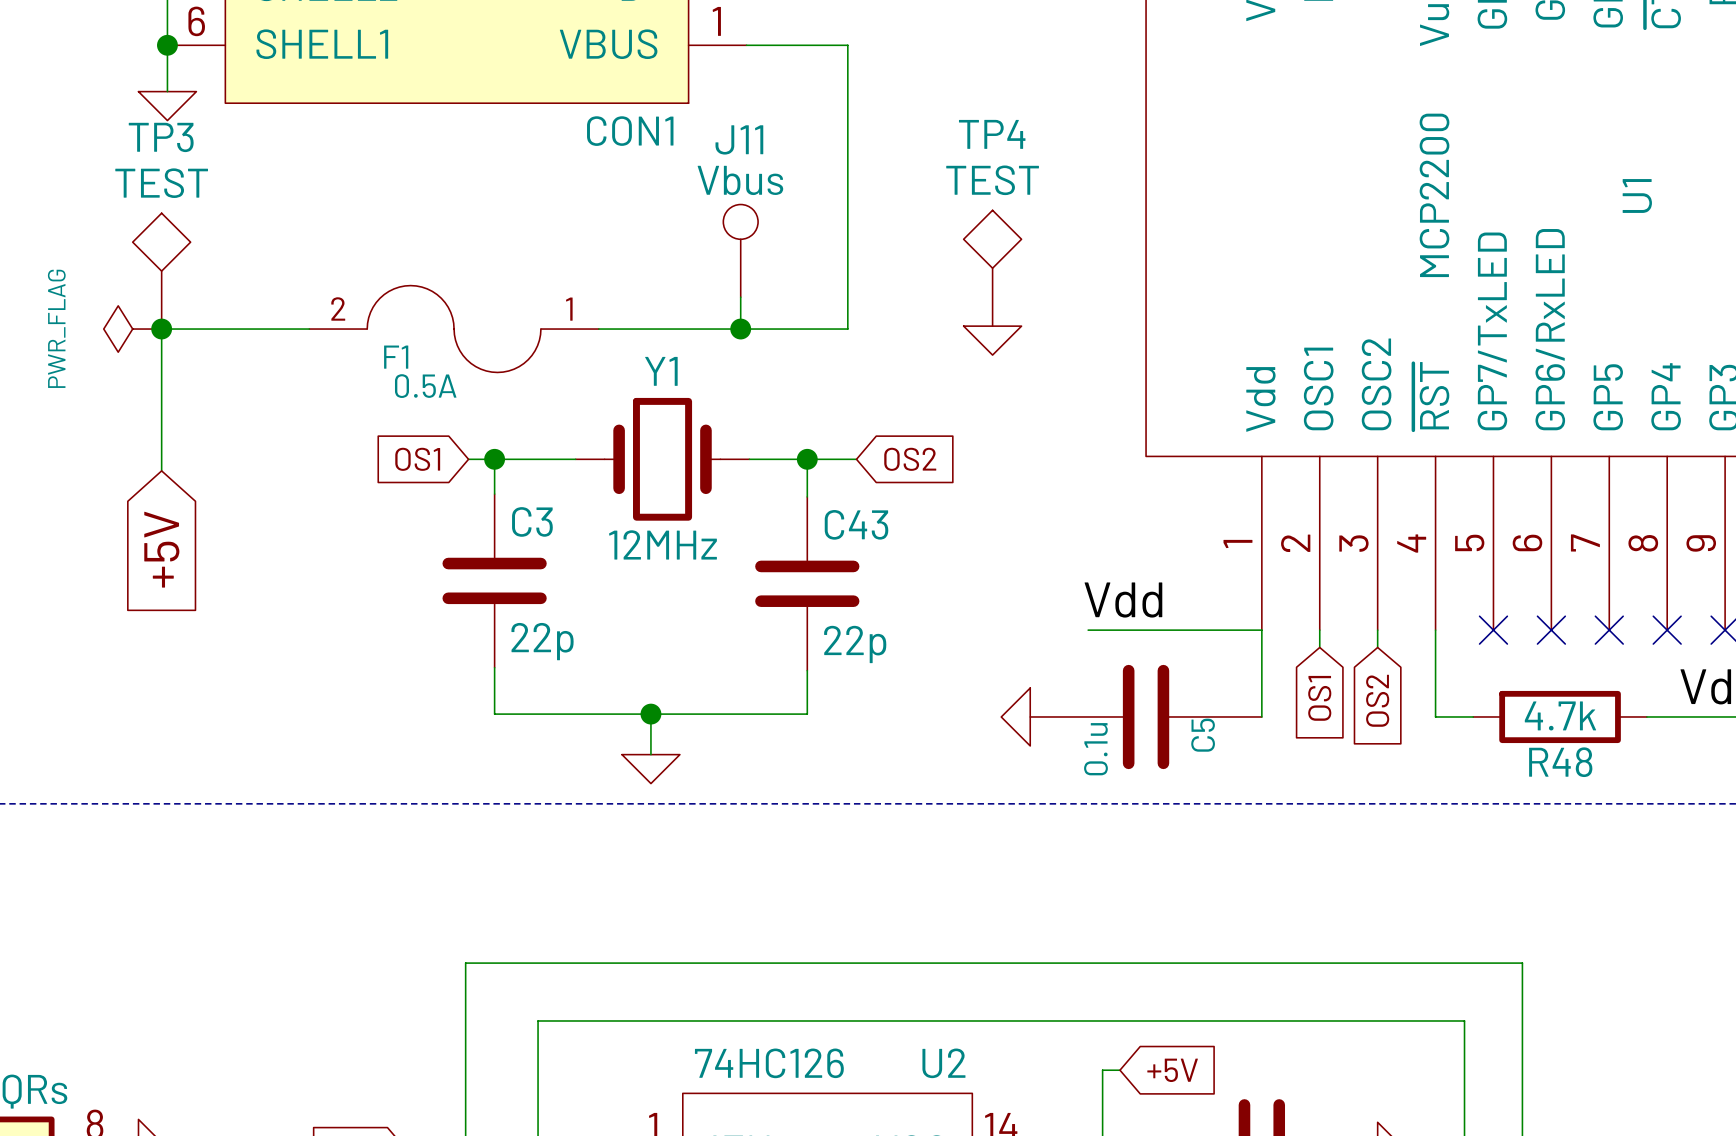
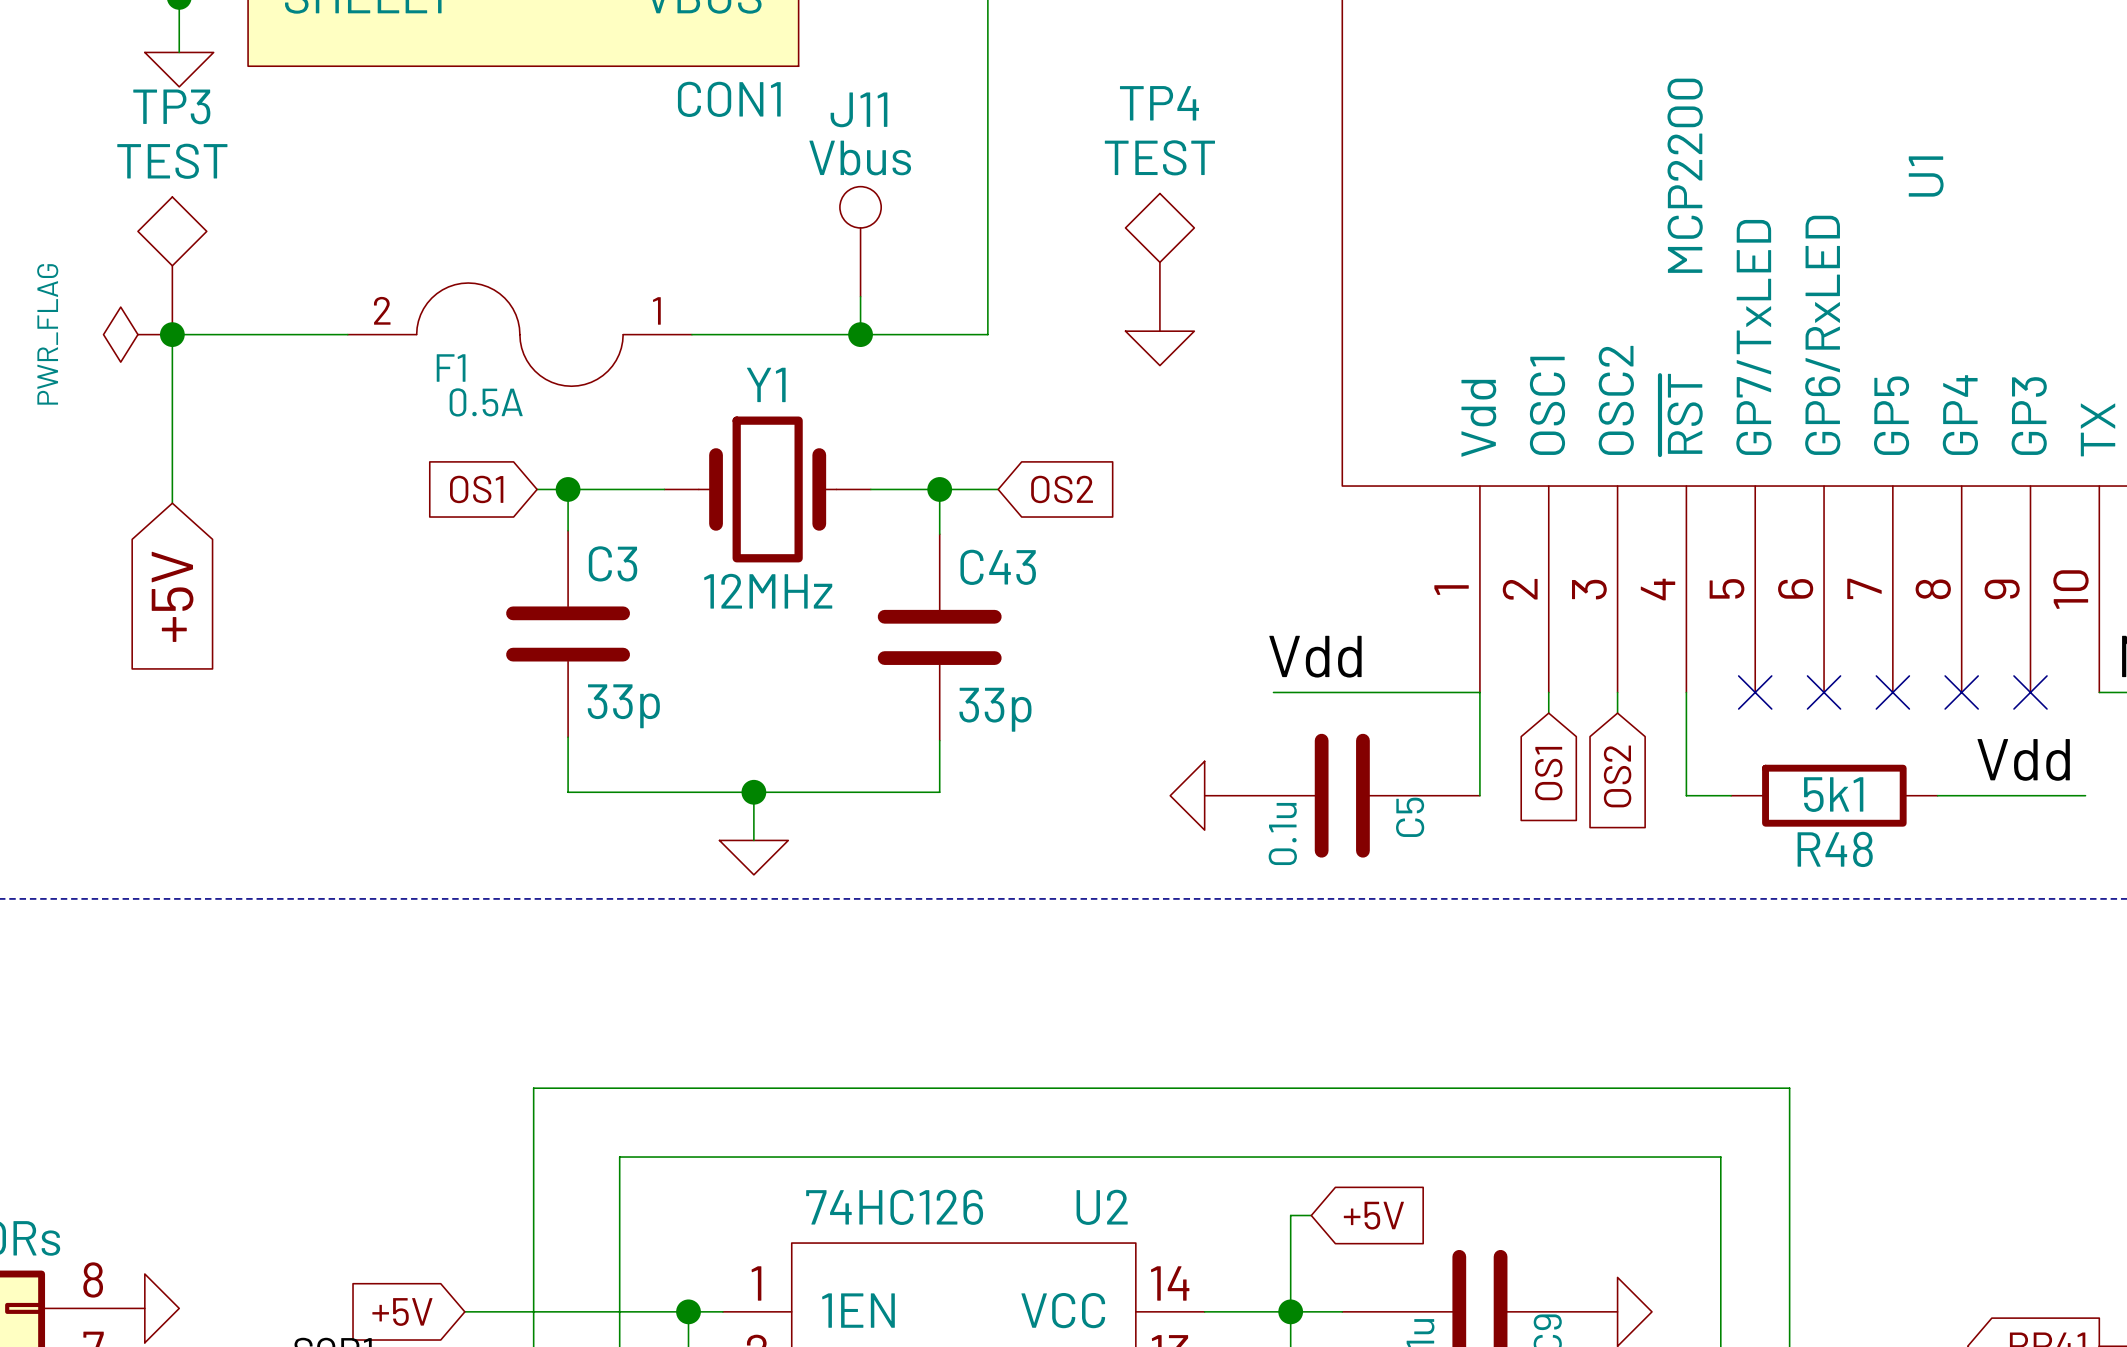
C3 value: 22p (542, 641) -> 33p (623, 706)
C43 value: 22p (855, 644) -> 33p (995, 709)
R48 value: 4.7k (1560, 715) -> 5k1 (1833, 794)

